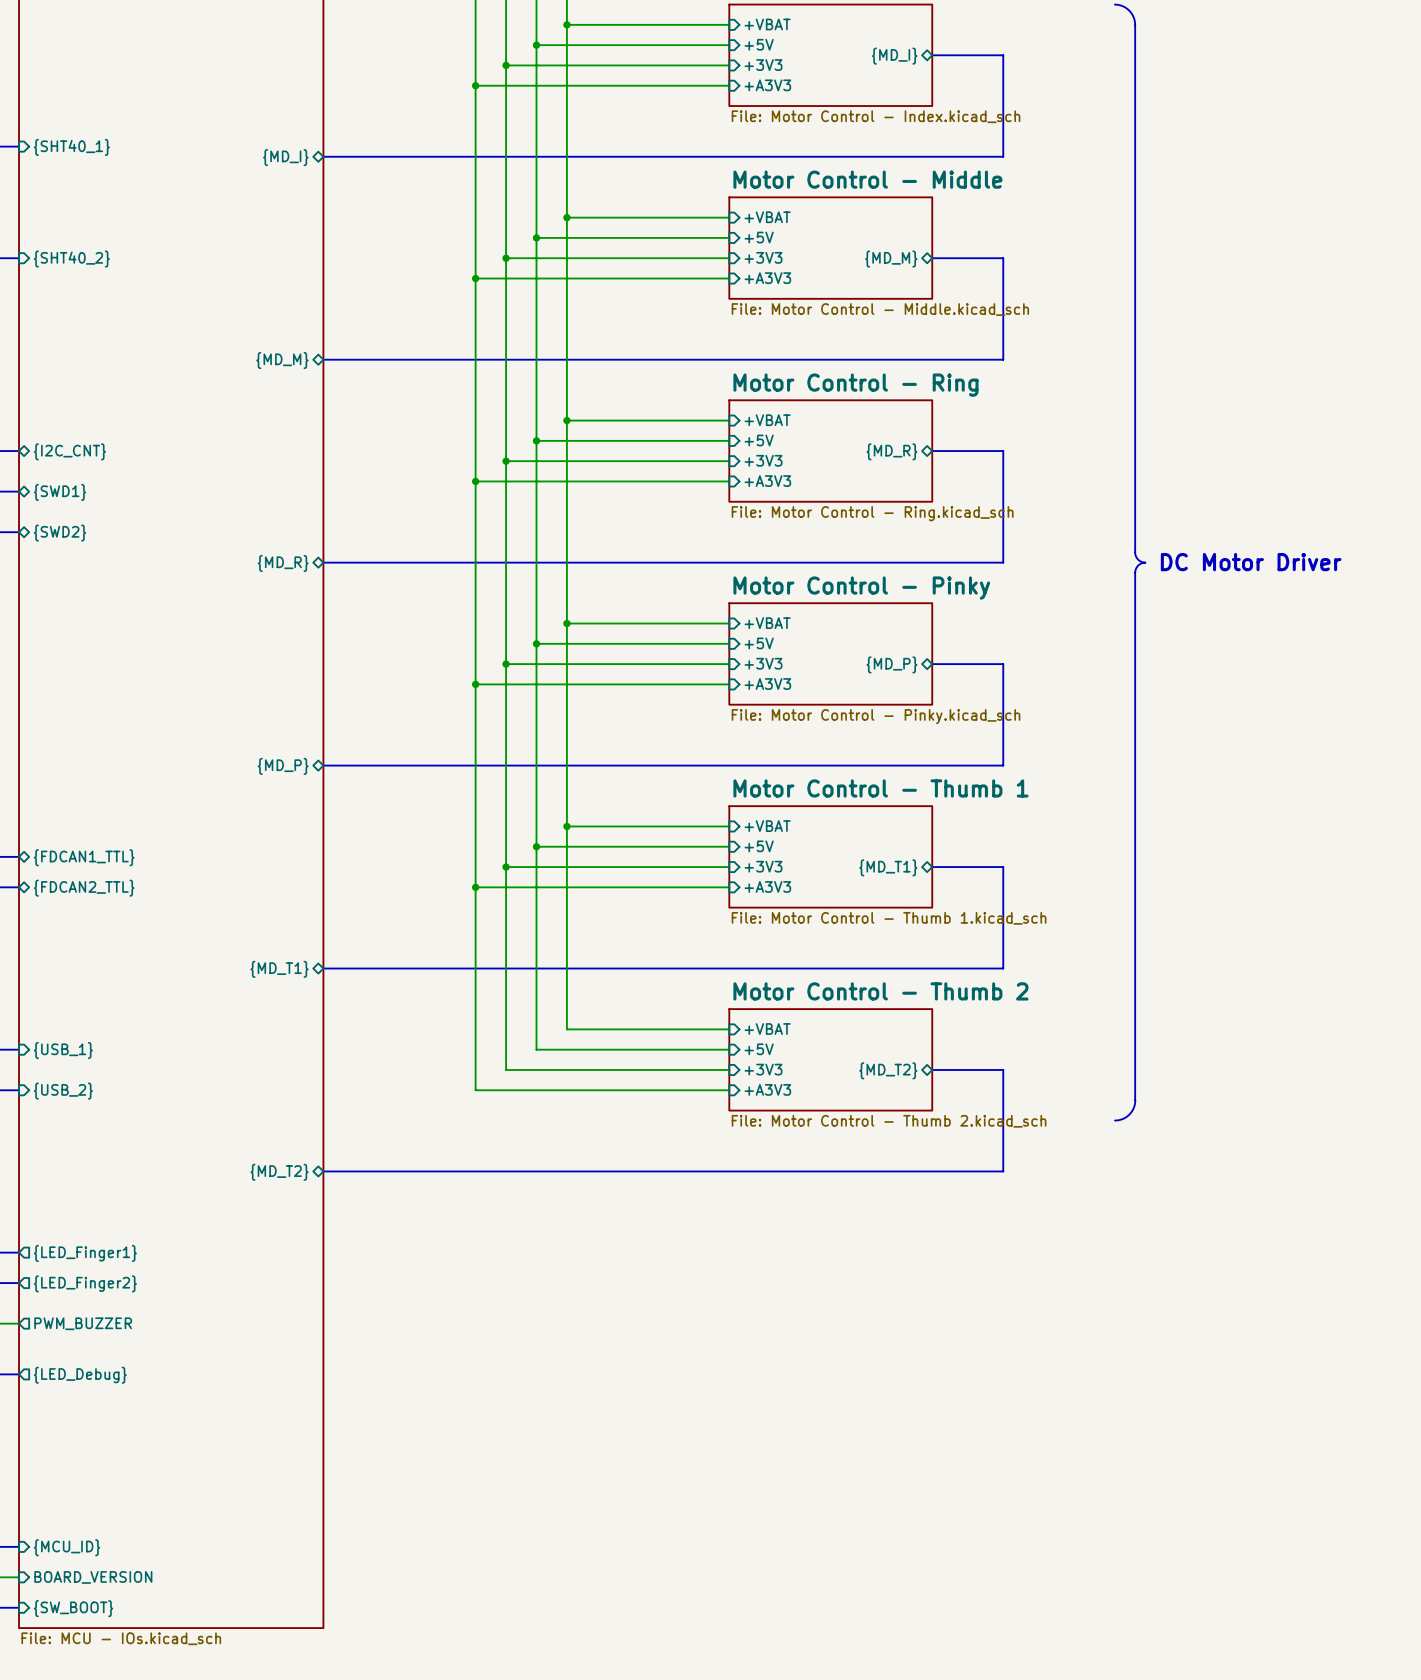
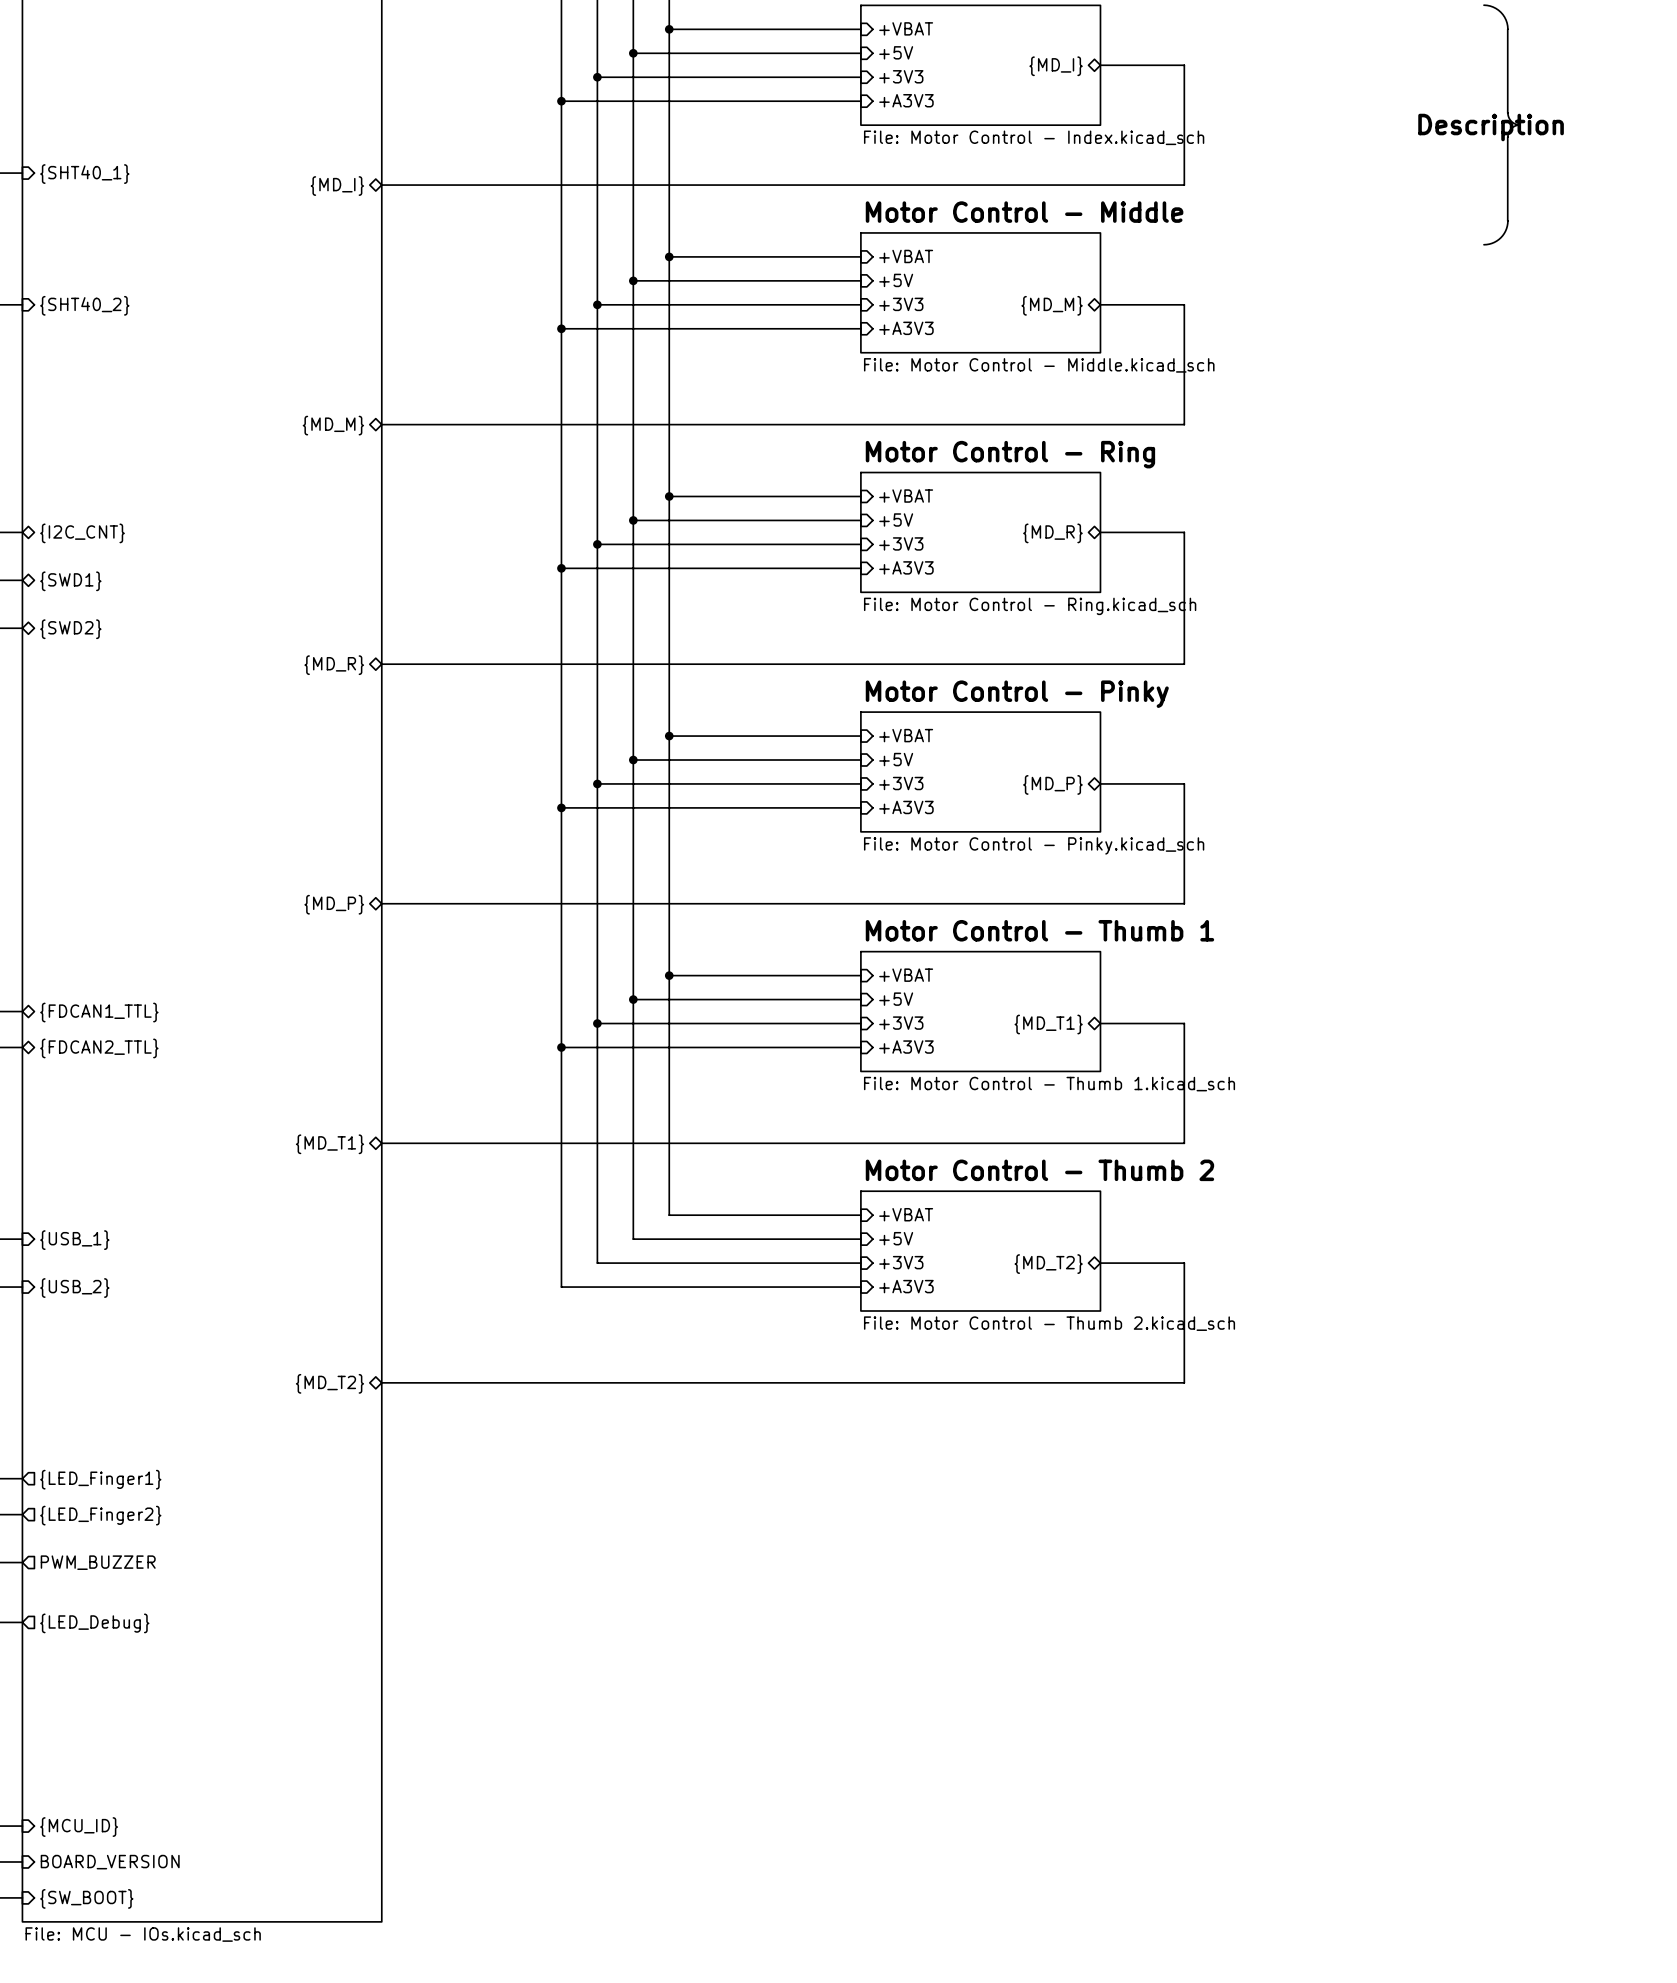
line: (1114, 4) (1122, 6) (1129, 10) (1133, 17) (1135, 24) (1135, 552) (1138, 559) (1145, 562) (1138, 565) (1135, 572) (1135, 1100) -> none
line: none -> (1483, 5) (1493, 7) (1500, 12) (1506, 20) (1507, 29)
line: none -> (1507, 29) (1507, 113)
line: none -> (1507, 112) (1511, 121) (1519, 124) (1511, 128) (1507, 136)
text: none -> Description (1491, 127)
line: none -> (1507, 137) (1507, 220)
line: none -> (1507, 220) (1505, 231) (1500, 237) (1491, 243) (1483, 244)
text: DC Motor Driver (1251, 562) -> none
line: (1135, 1100) (1133, 1109) (1129, 1114) (1121, 1119) (1115, 1120) -> none

